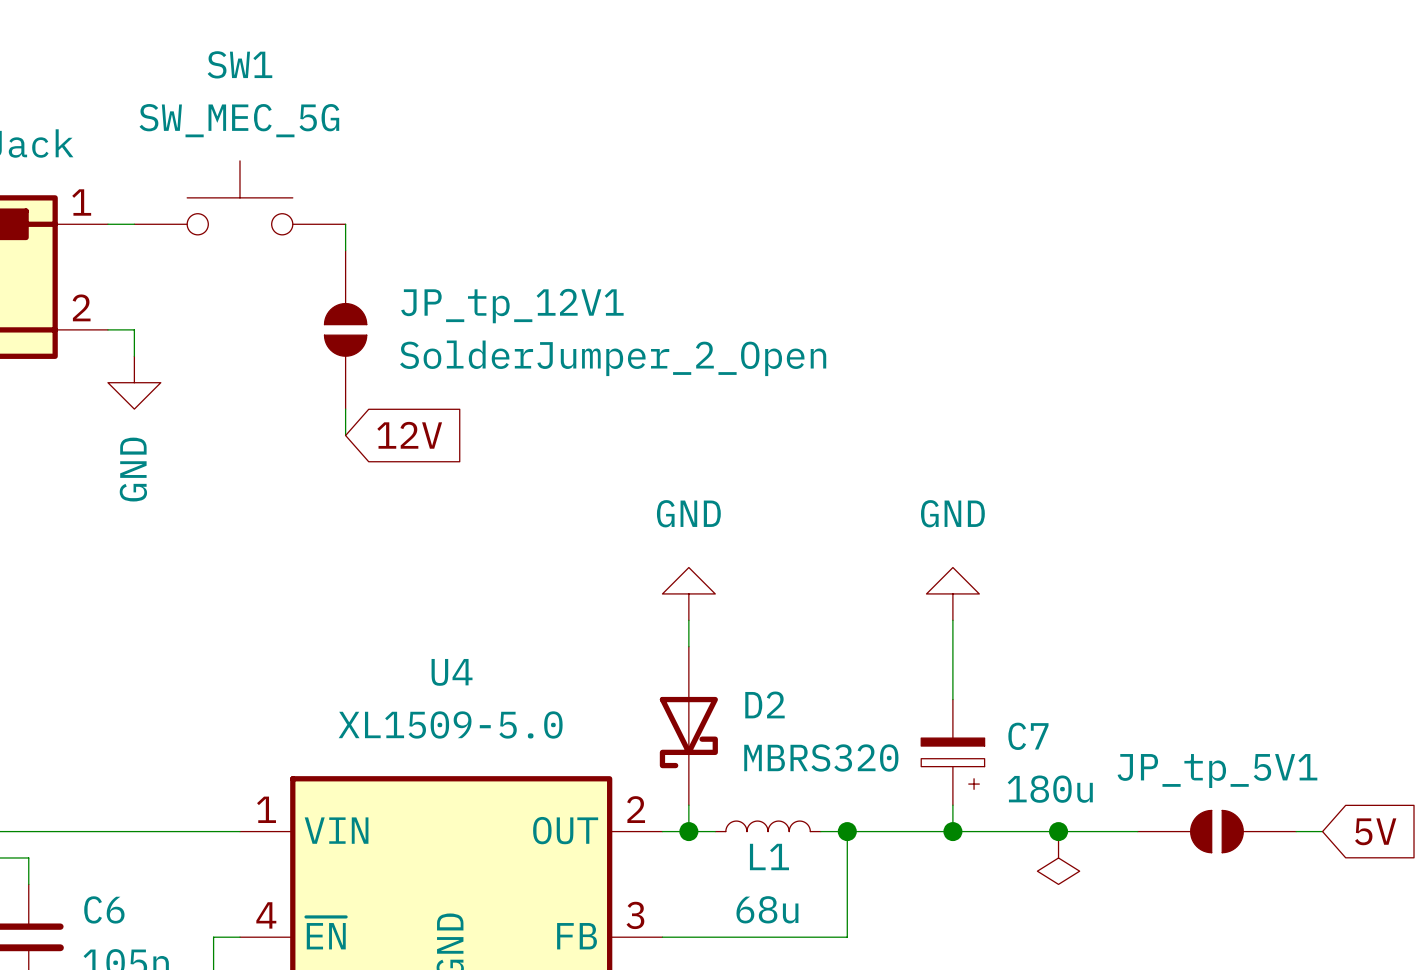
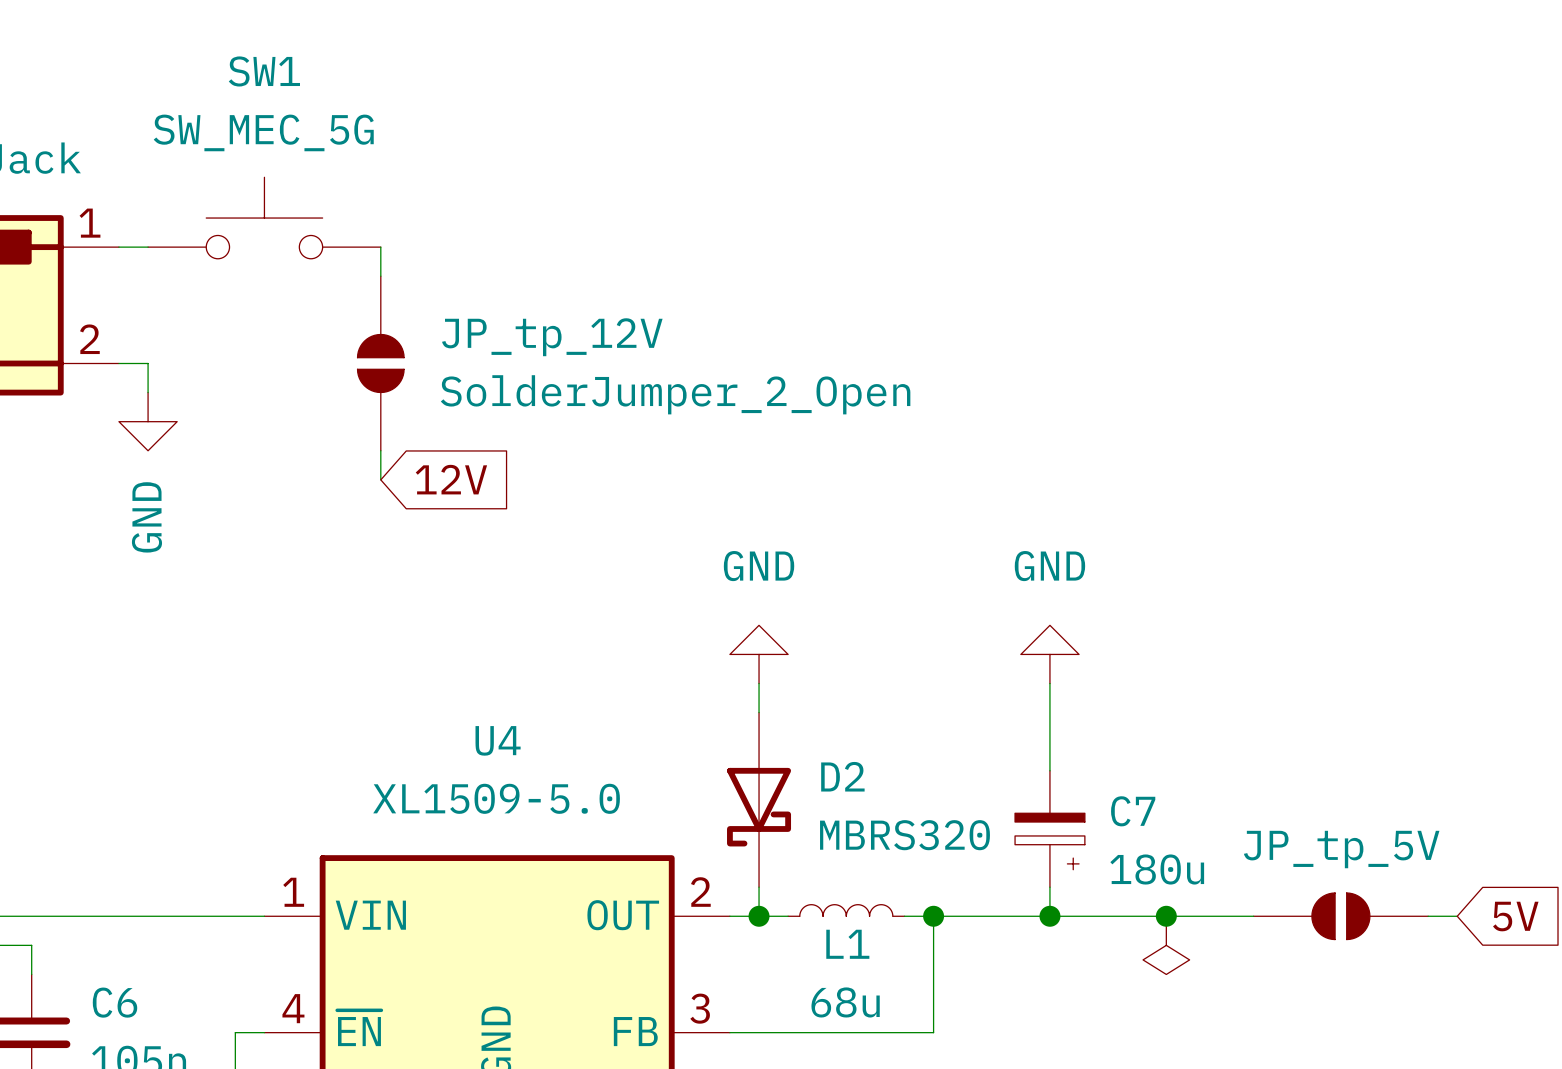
JP_tp_12V1 name: JP_tp_12V1 (512, 306) -> JP_tp_12V (552, 337)
JP_tp_5V1 name: JP_tp_5V1 (1217, 771) -> JP_tp_5V (1341, 849)

